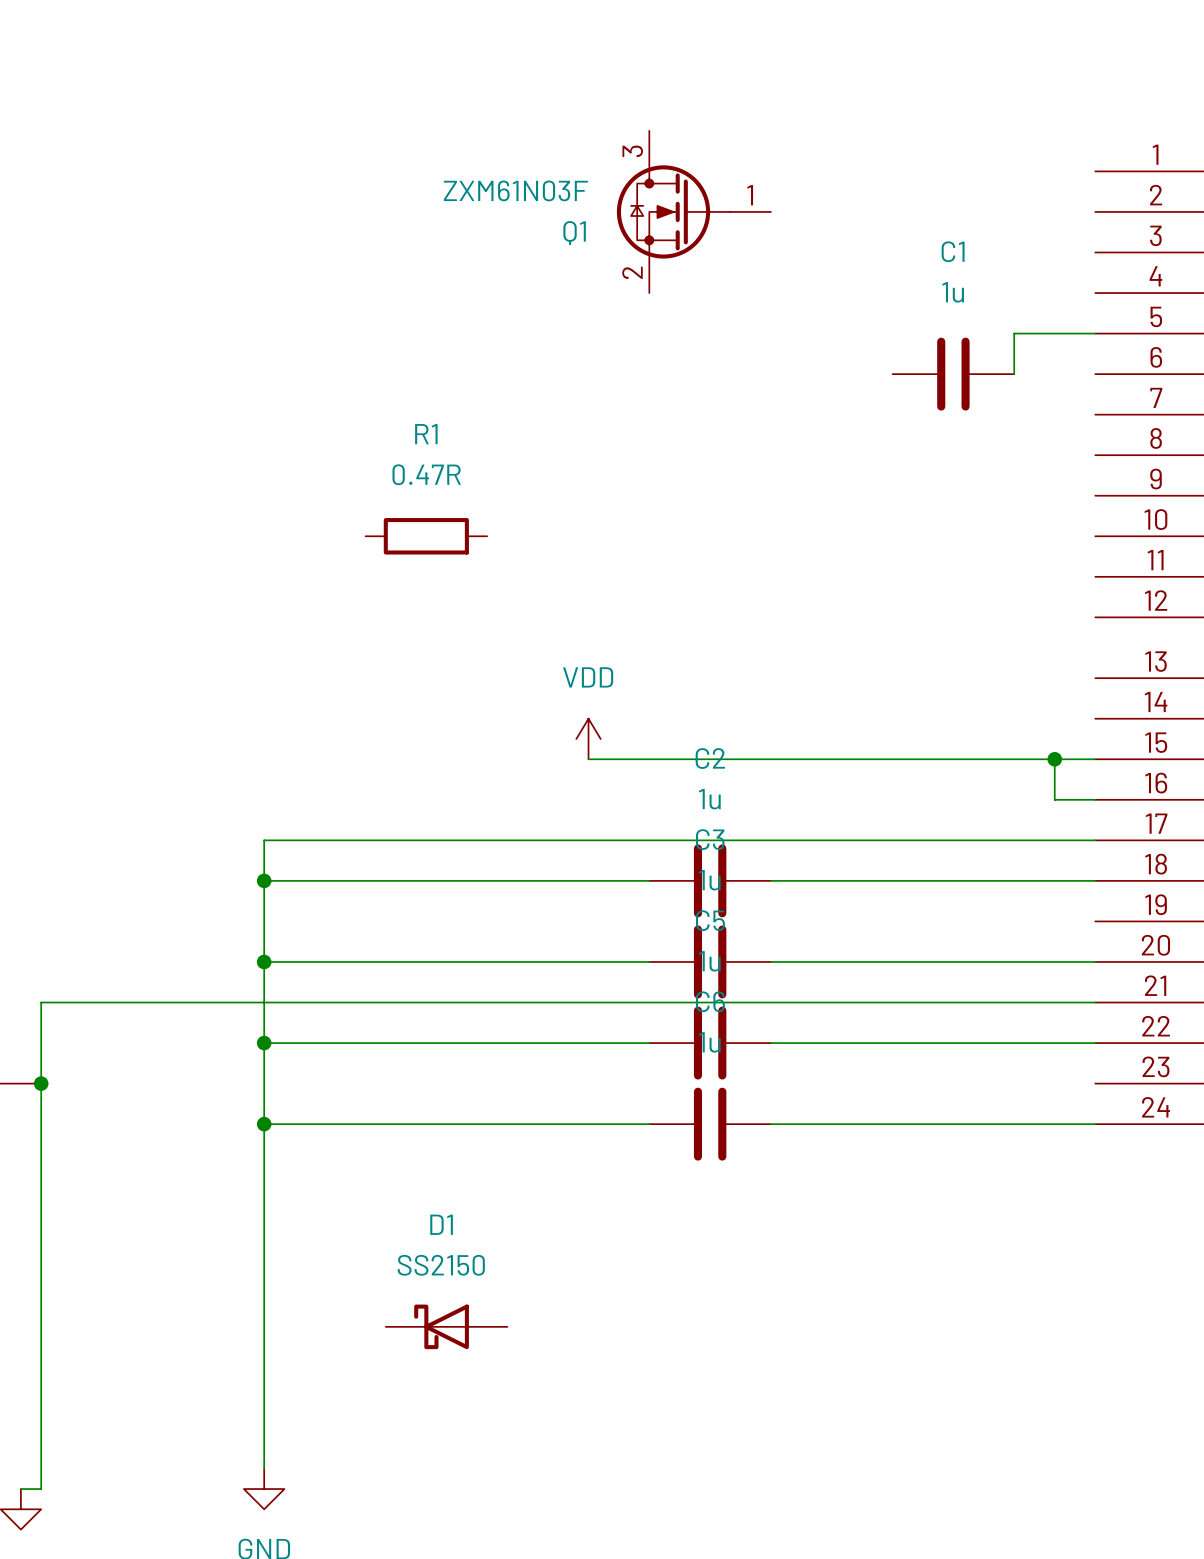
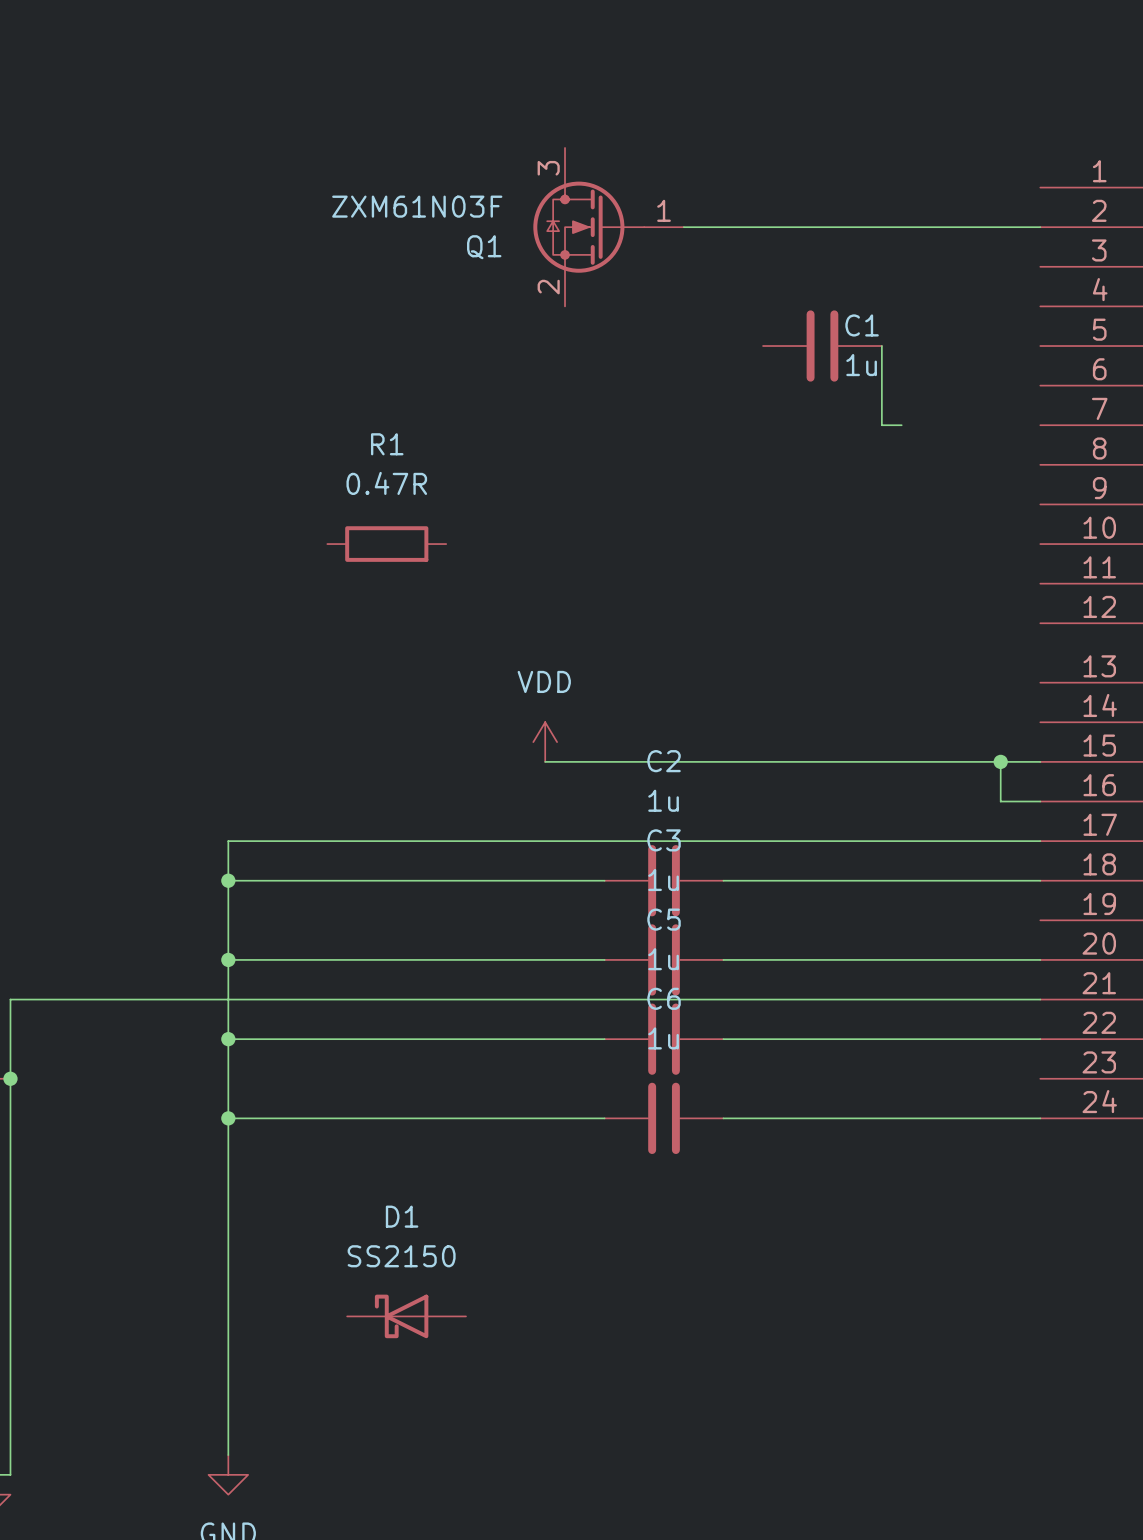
Q1 position: (693, 211) -> (608, 227)
wire: none -> (683, 227) (1040, 227)
C1 name position: C1 (953, 251) -> C1 (862, 325)
C1 value position: 1u (953, 292) -> 1u (861, 365)
wire: none -> (881, 346) (881, 425) (901, 425)
wire: (1095, 333) (1014, 333) (1014, 374) -> none
C1 position: (953, 374) -> (822, 346)

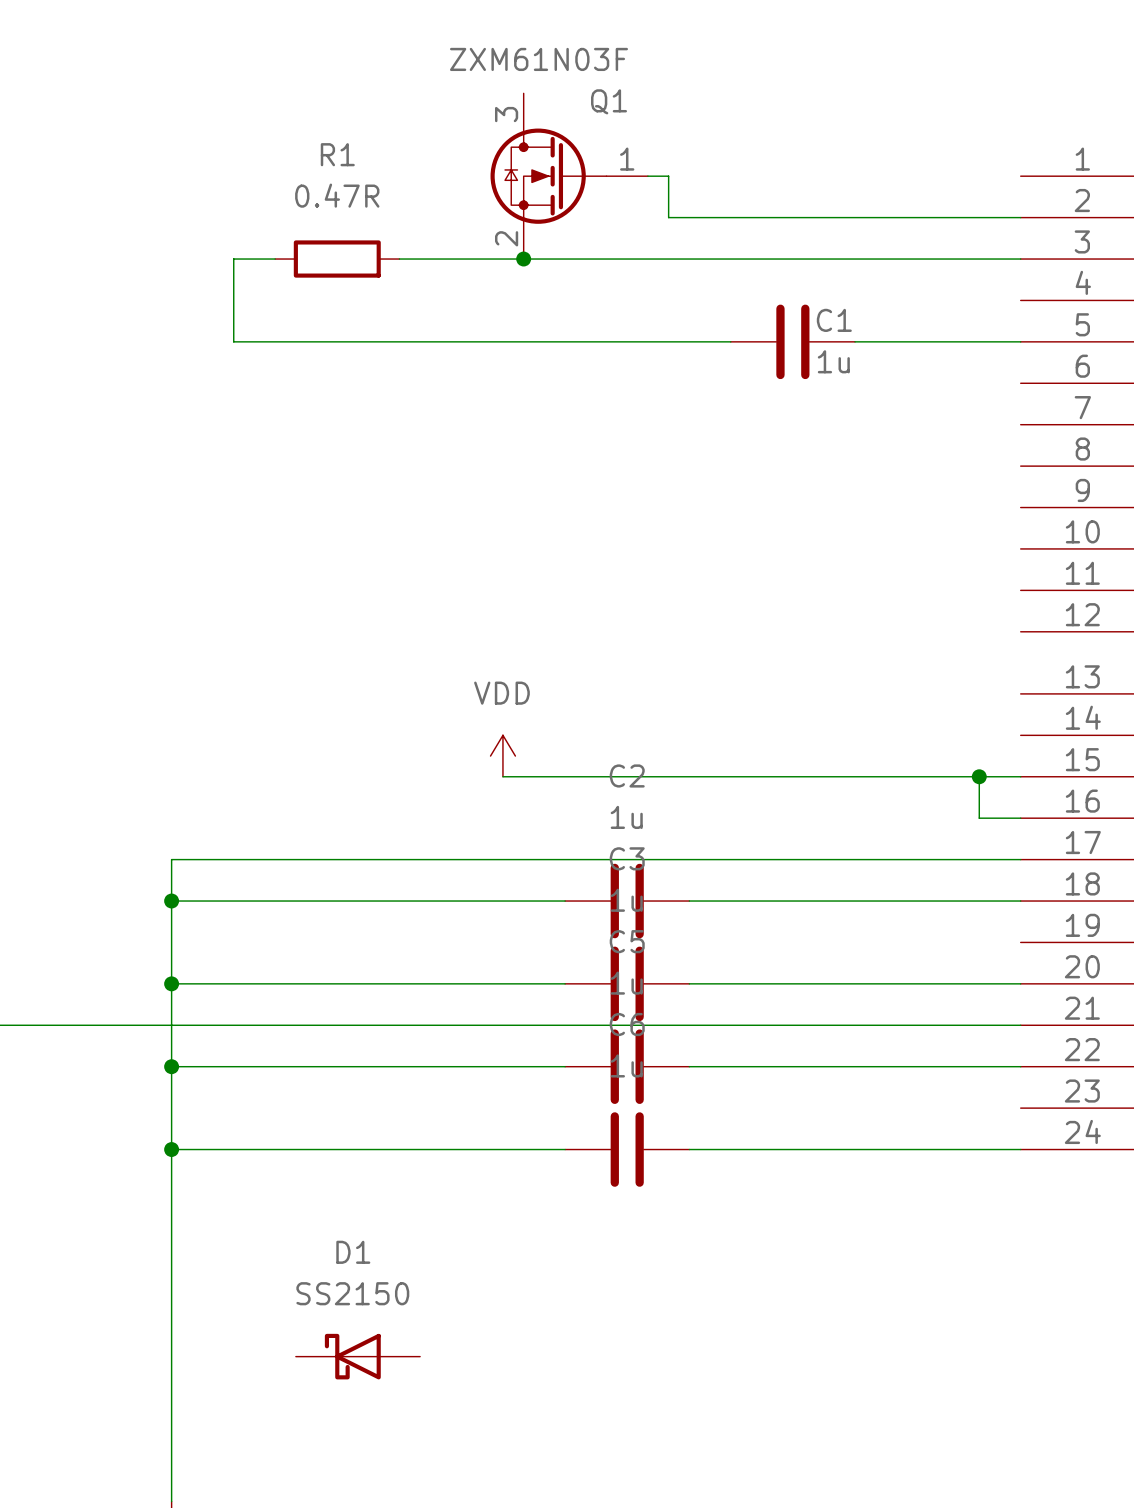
Q1 value position: ZXM61N03F (417, 206) -> ZXM61N03F (539, 59)
Q1 position: (608, 227) -> (569, 176)
wire: (683, 227) (703, 227) -> (647, 176) (668, 176) (668, 217)
Q1 name position: Q1 (484, 247) -> Q1 (609, 101)
wire: none -> (275, 259) (233, 259) (233, 341) (730, 341)
wire: none -> (399, 259) (1020, 259)
junction: none -> (523, 259)
wire: (881, 346) (881, 425) (901, 425) -> (855, 341) (1020, 341)
R1 position: (386, 544) -> (337, 259)

